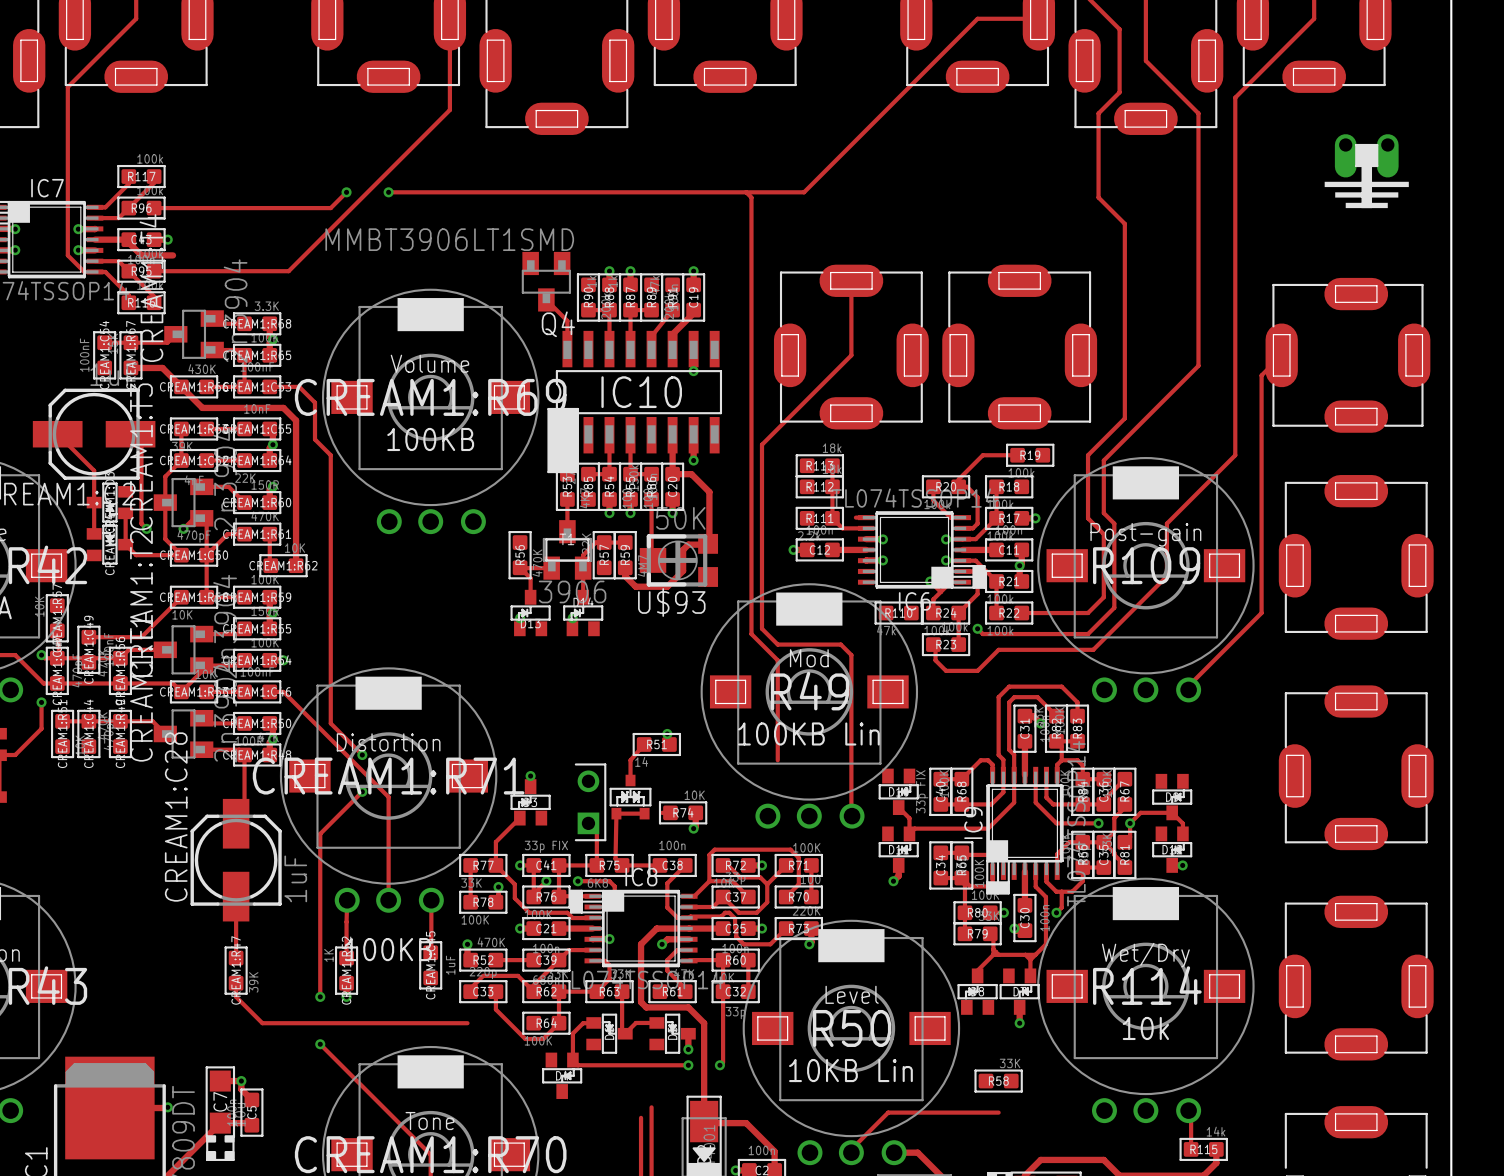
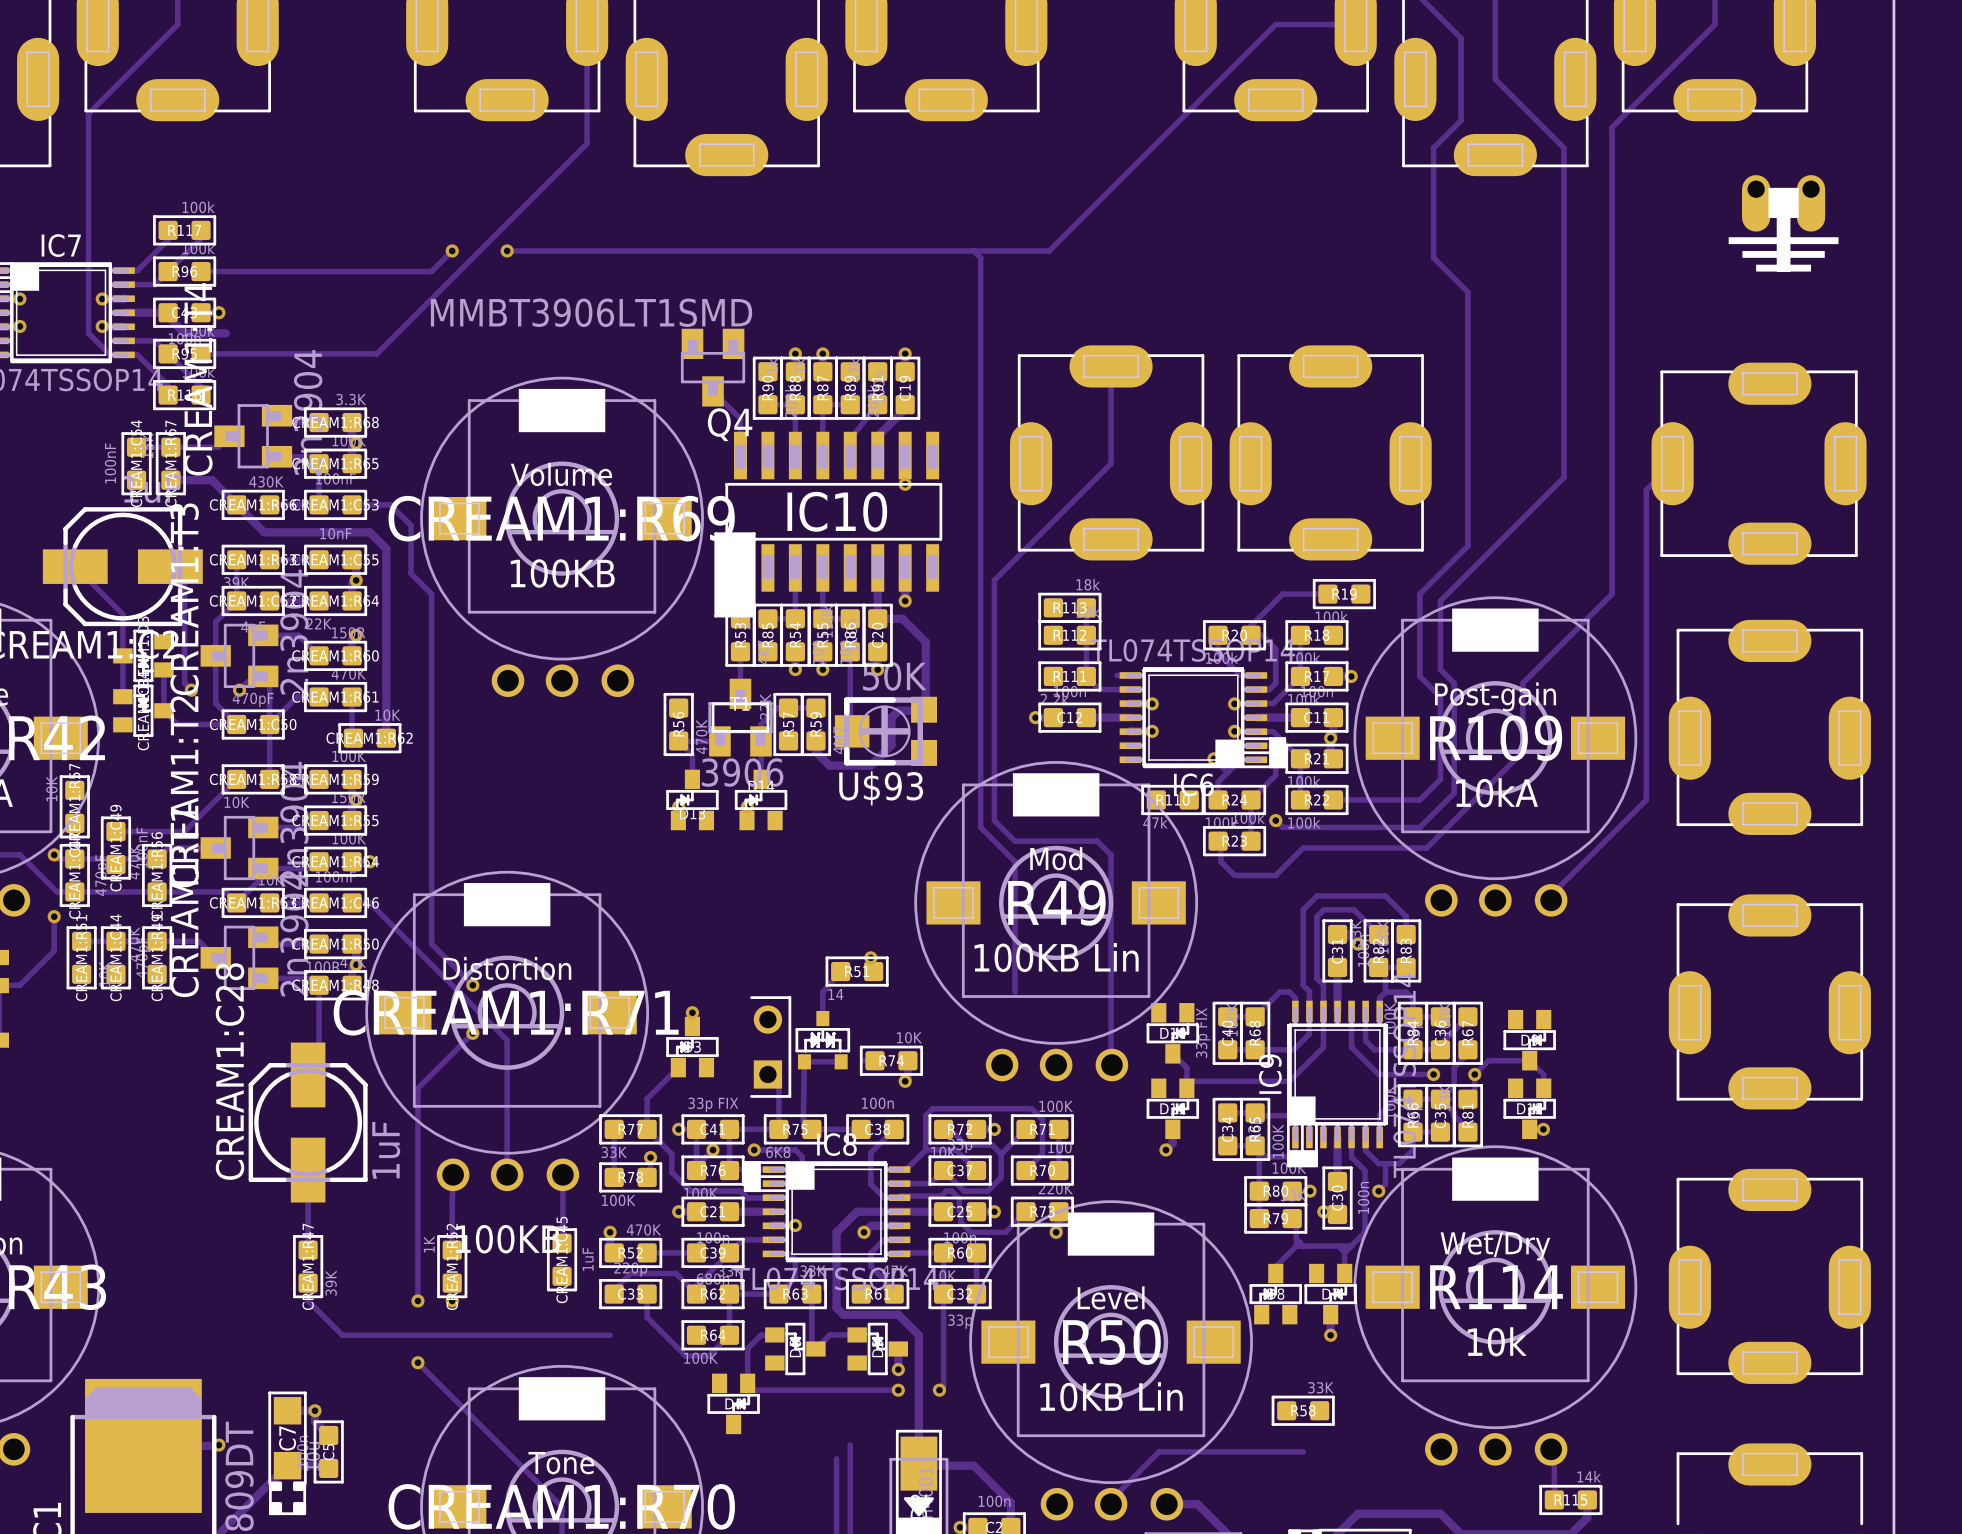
R109 value: none -> 10kA (1497, 792)

